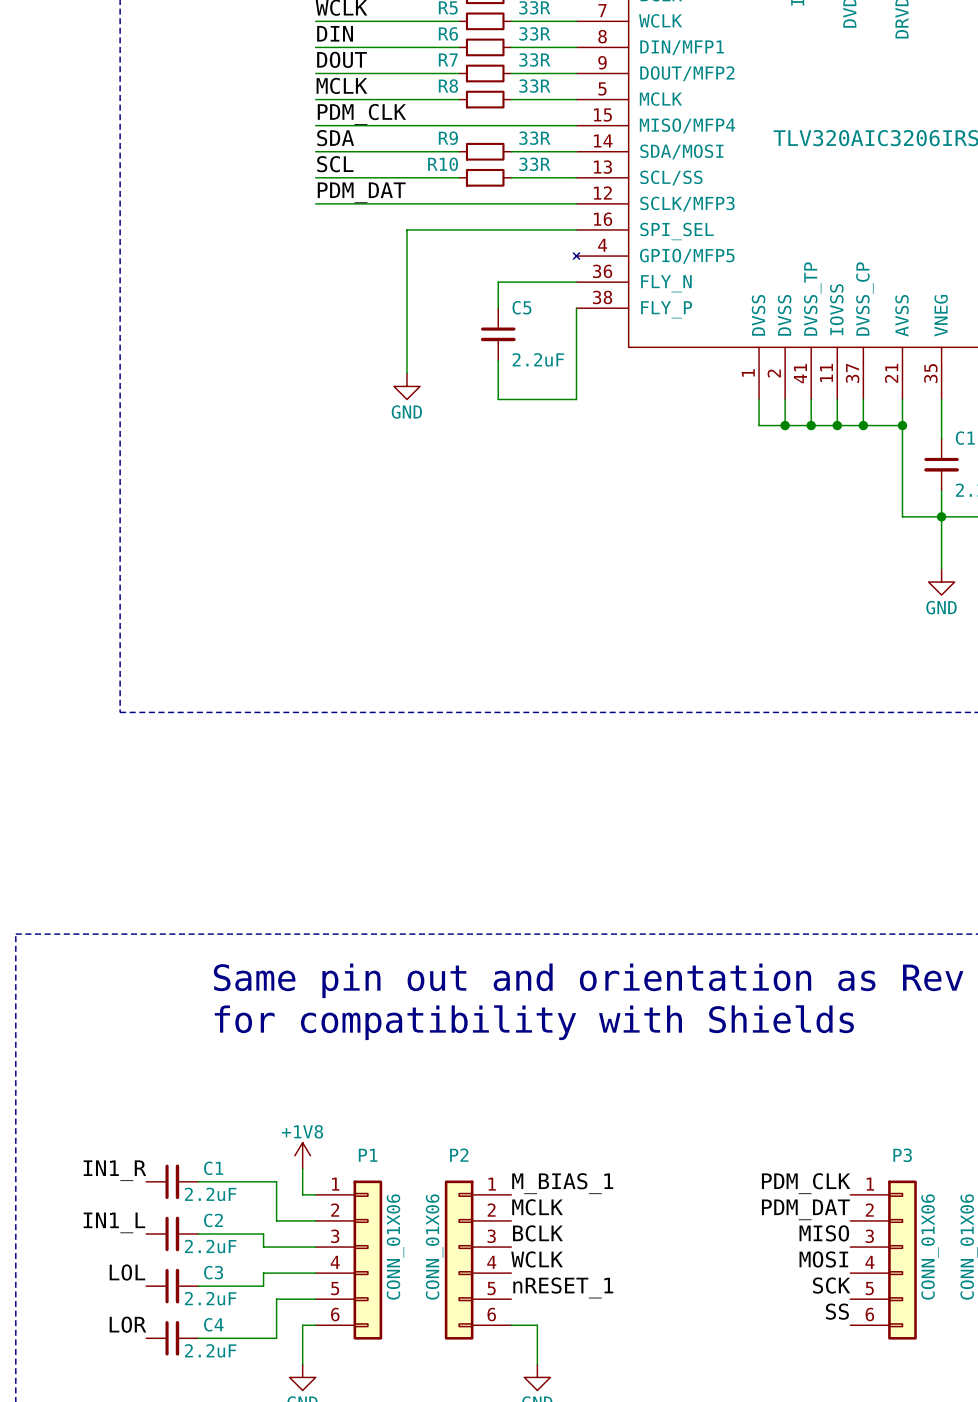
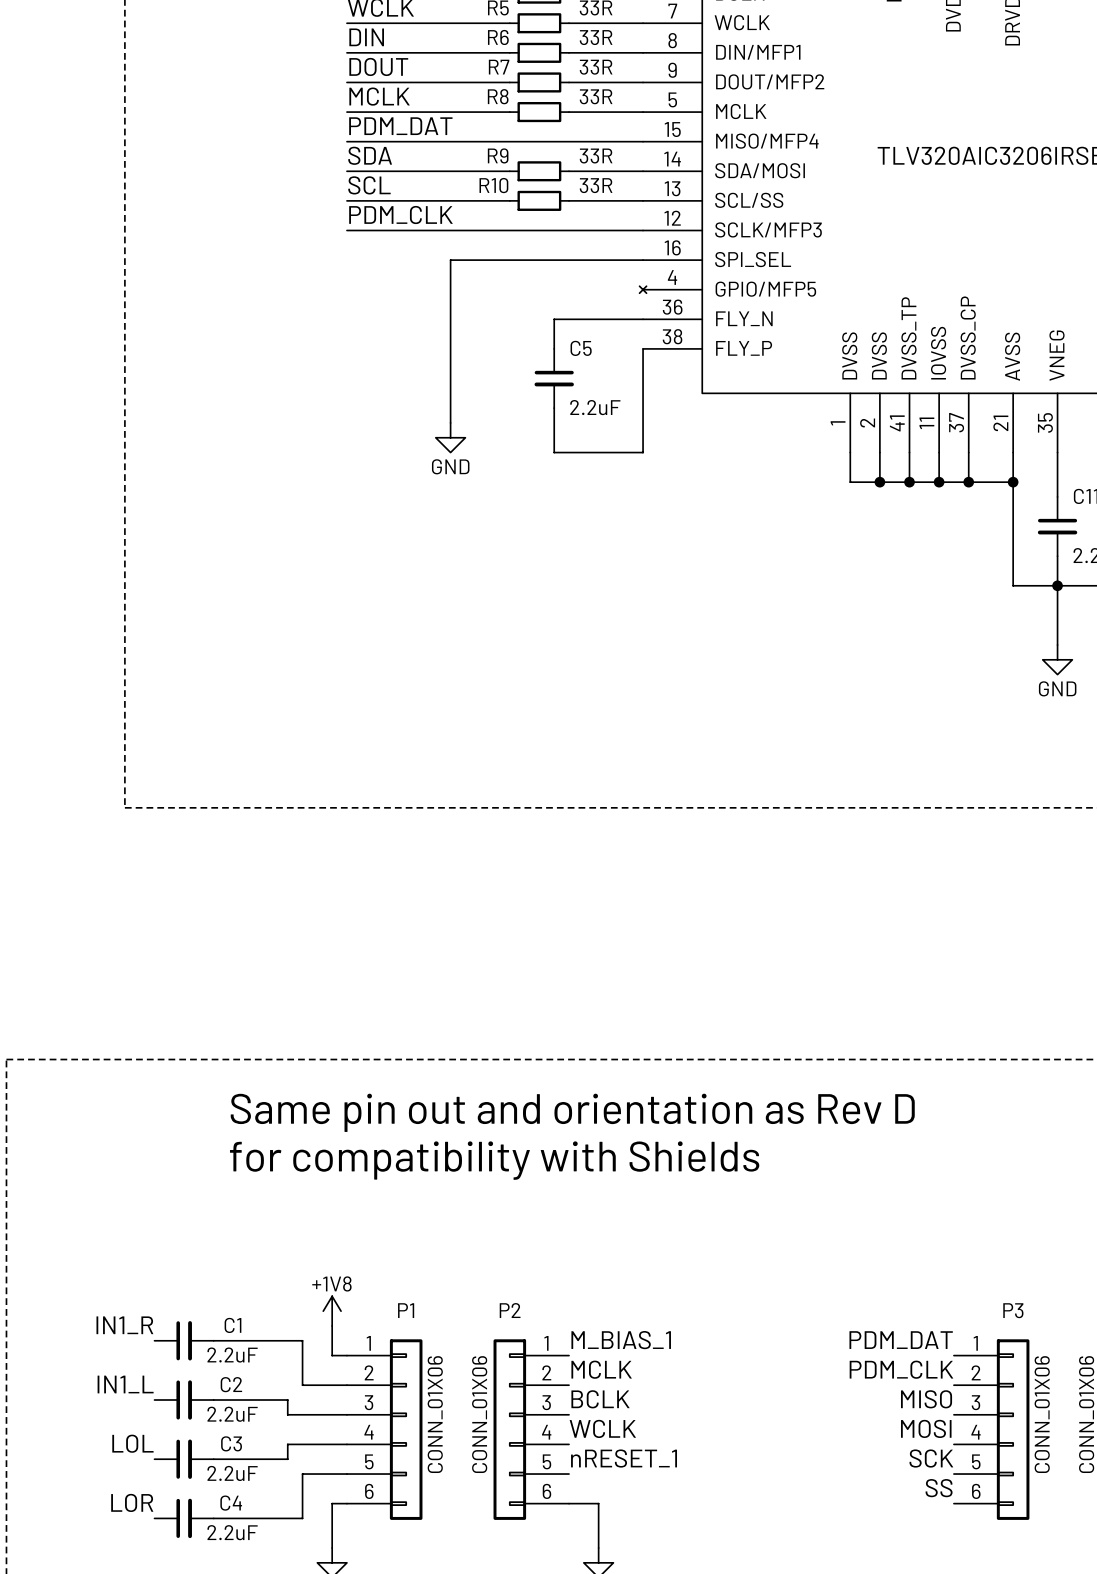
label: PDM_CLK (361, 114) -> PDM_DAT (400, 126)
label: PDM_DAT (361, 192) -> PDM_CLK (400, 215)
label: PDM_CLK (806, 1183) -> PDM_DAT (901, 1340)
label: PDM_DAT (805, 1209) -> PDM_CLK (901, 1369)

